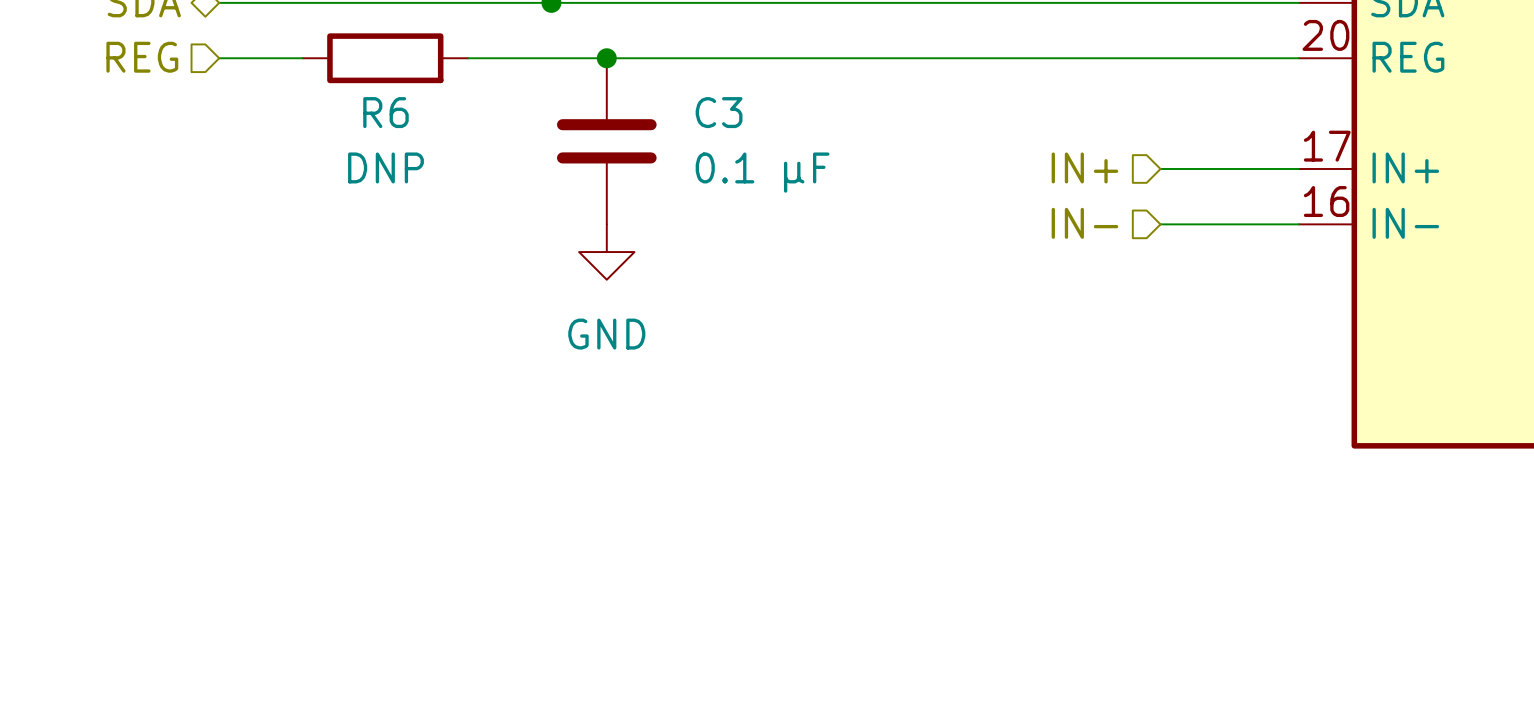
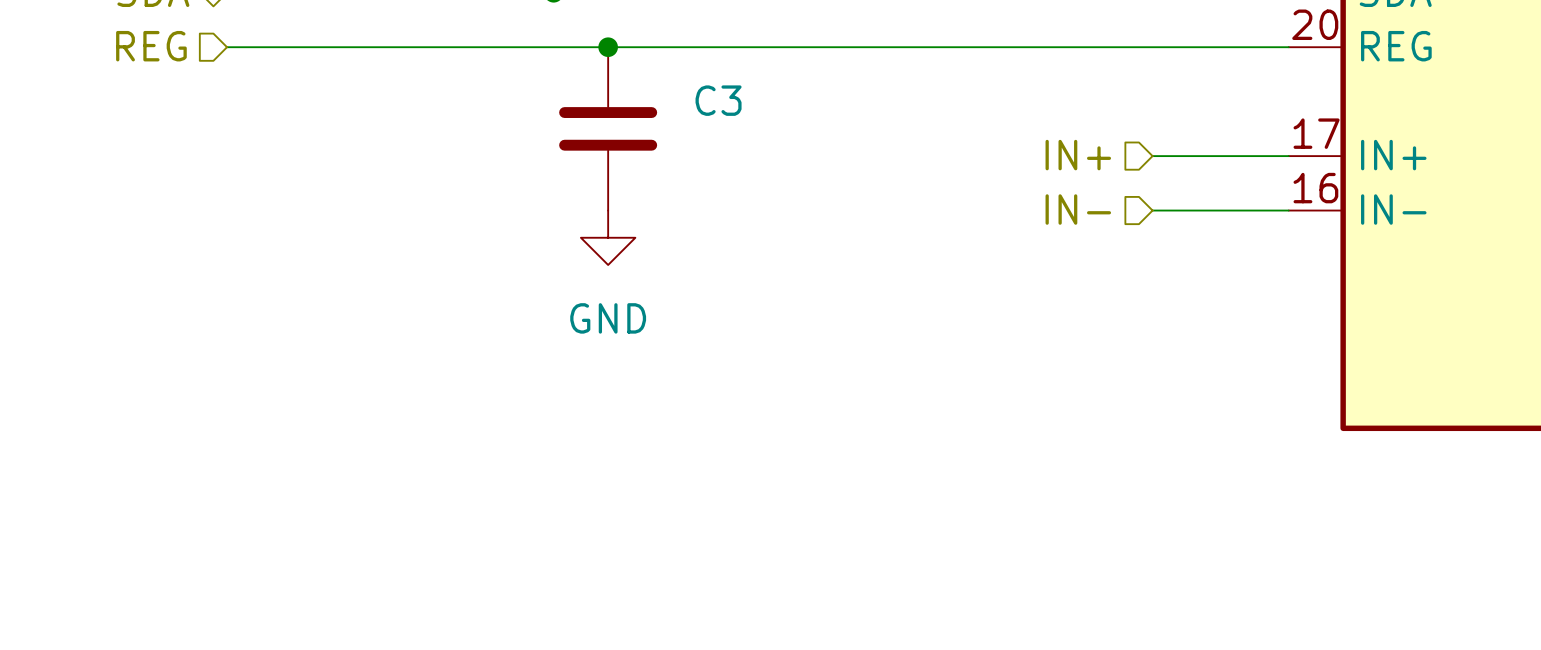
wire: none -> (308, 47) (472, 47)
R6: DNP (385, 58) -> none
C3 value: 0.1 µF (762, 172) -> none

